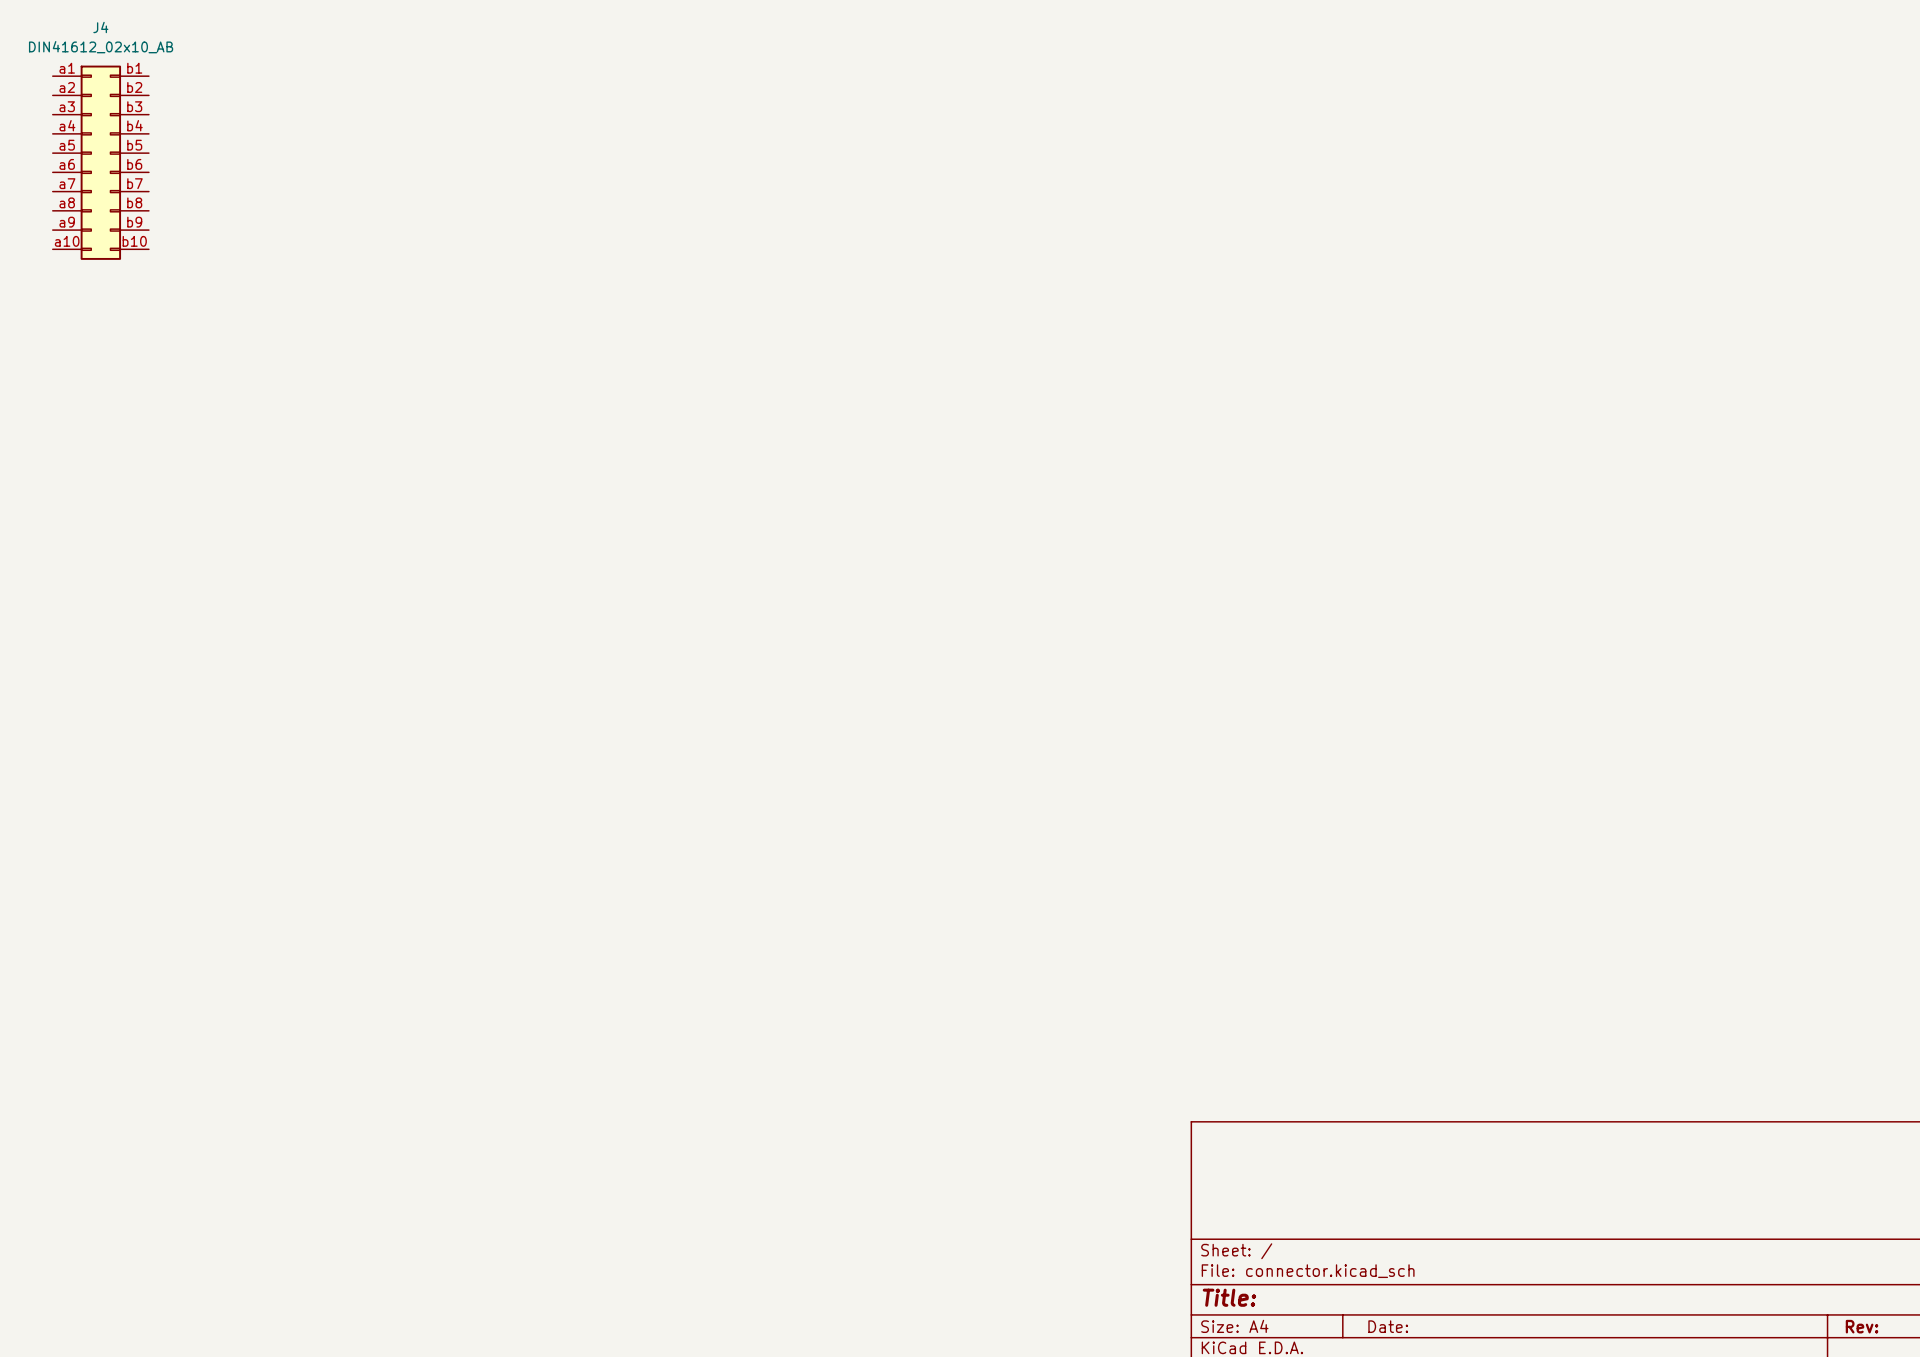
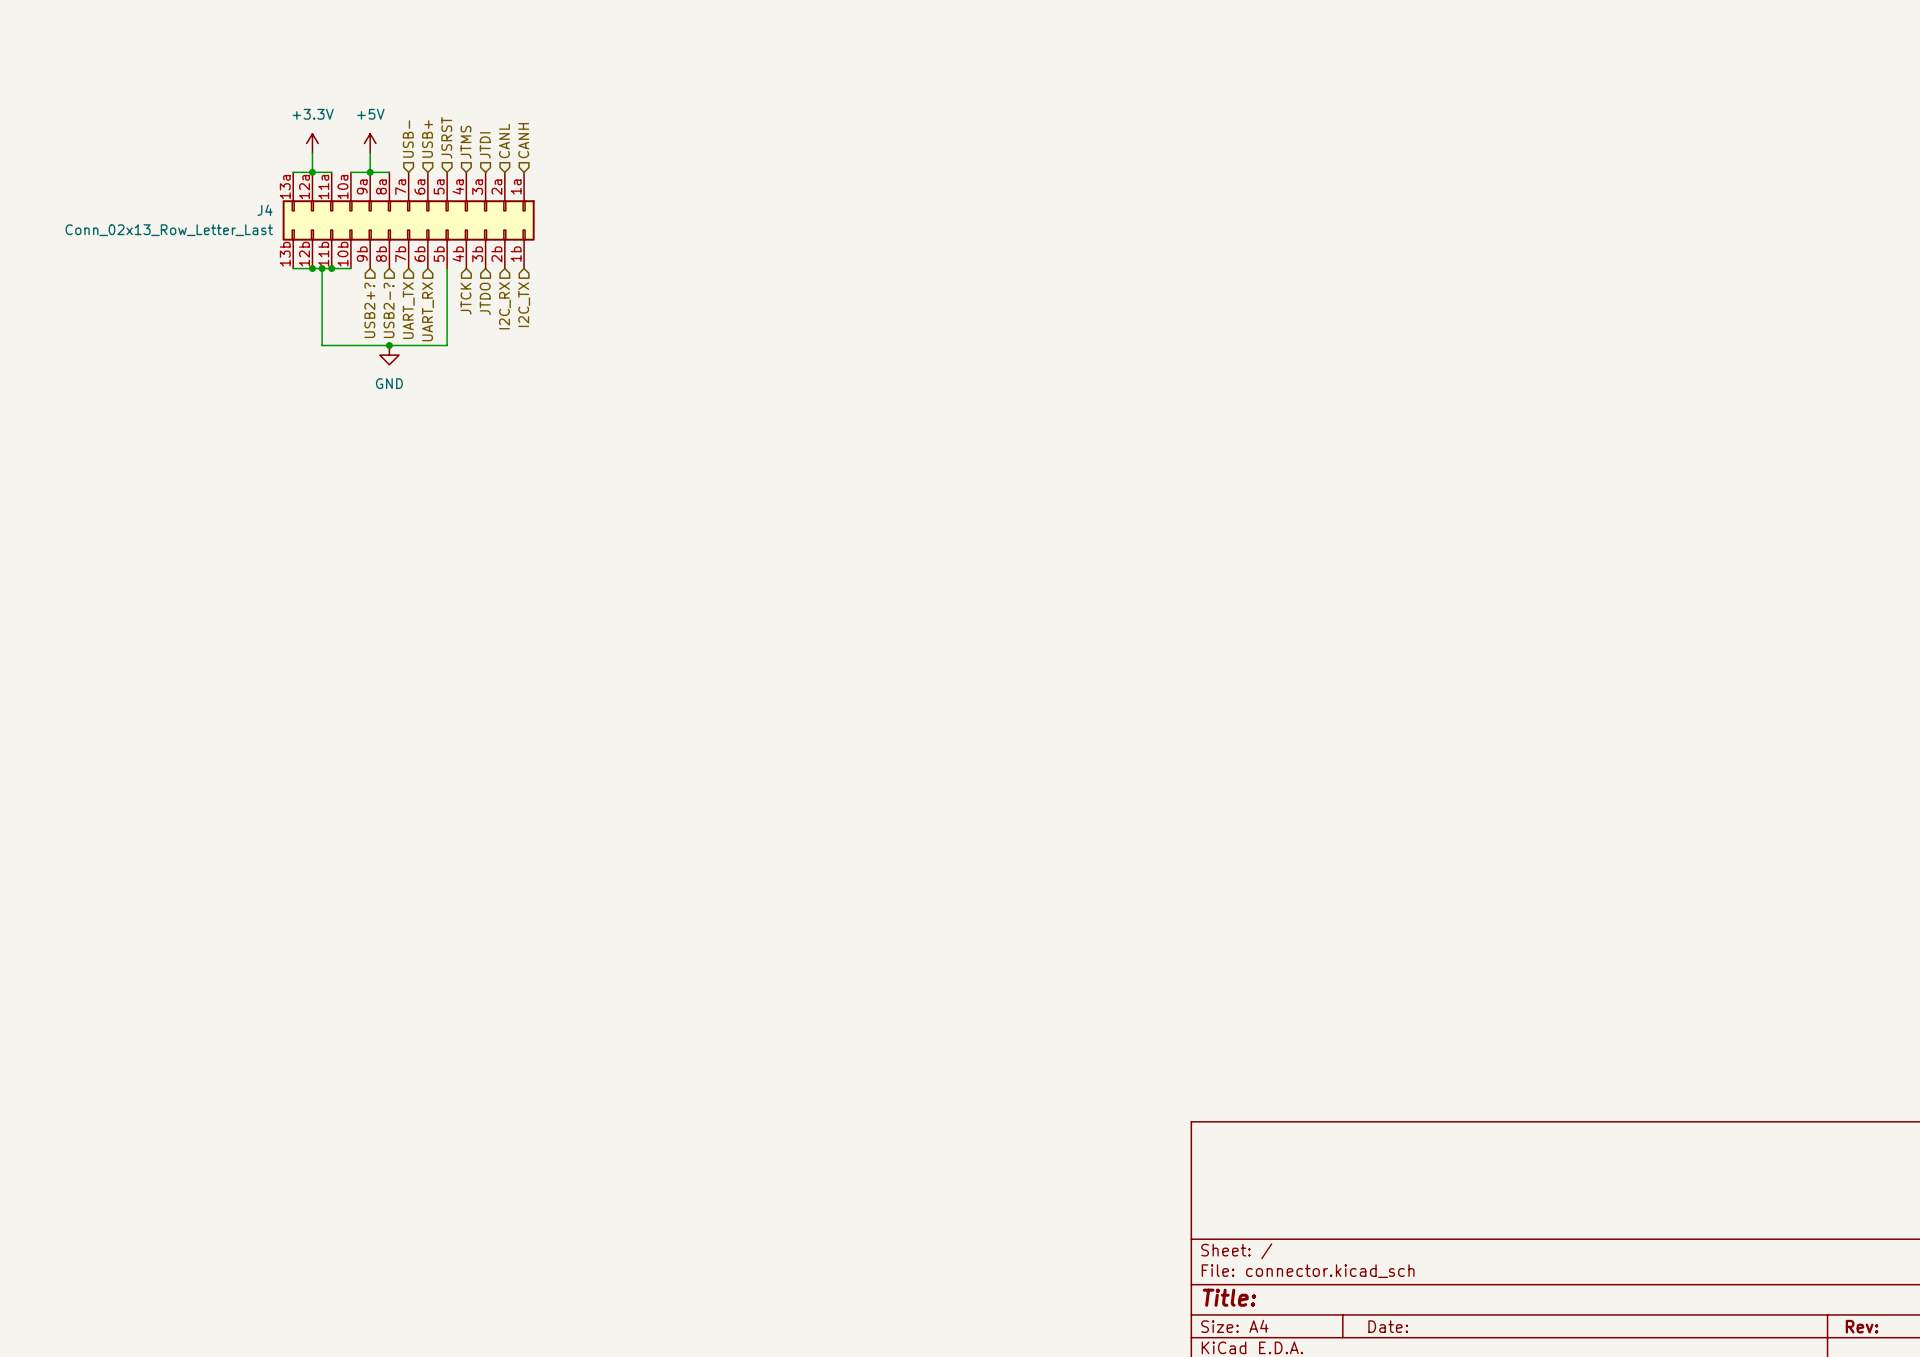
J4 name position: J4 (100, 27) -> J4 (264, 210)
J4 value: DIN41612_02x10_AB (101, 47) -> Conn_02x13_Row_Letter_Last (169, 230)
J4 symbol: [52, 65, 149, 260] -> [282, 172, 535, 269]
hierarchical label: none -> JSRST (446, 137)
hierarchical label: none -> USB- (408, 139)
hierarchical label: none -> USB+ (427, 139)
hierarchical label: none -> CANH (523, 140)
hierarchical label: none -> CANL (504, 141)
hierarchical label: none -> JTMS (466, 142)
power symbol: none -> +3.3V (312, 143)
power symbol: none -> +5V (370, 143)
hierarchical label: none -> JTDI (485, 145)
wire: none -> (312, 153) (312, 172)
wire: none -> (370, 153) (370, 172)
wire: none -> (293, 172) (331, 172)
junction: none -> (312, 172)
wire: none -> (350, 172) (389, 172)
junction: none -> (370, 172)
wire: none -> (293, 268) (350, 268)
junction: none -> (312, 268)
wire: none -> (322, 268) (322, 345) (447, 345) (447, 268)
junction: none -> (322, 268)
junction: none -> (331, 268)
hierarchical label: none -> JTCK (466, 298)
hierarchical label: none -> JTDO (485, 298)
hierarchical label: none -> I2C_TX (524, 304)
hierarchical label: none -> I2C_RX (504, 305)
hierarchical label: none -> USB2+? (369, 310)
hierarchical label: none -> USB2-? (389, 310)
hierarchical label: none -> UART_TX (408, 310)
hierarchical label: none -> UART_RX (427, 311)
junction: none -> (389, 345)
power symbol: none -> GND (389, 355)

